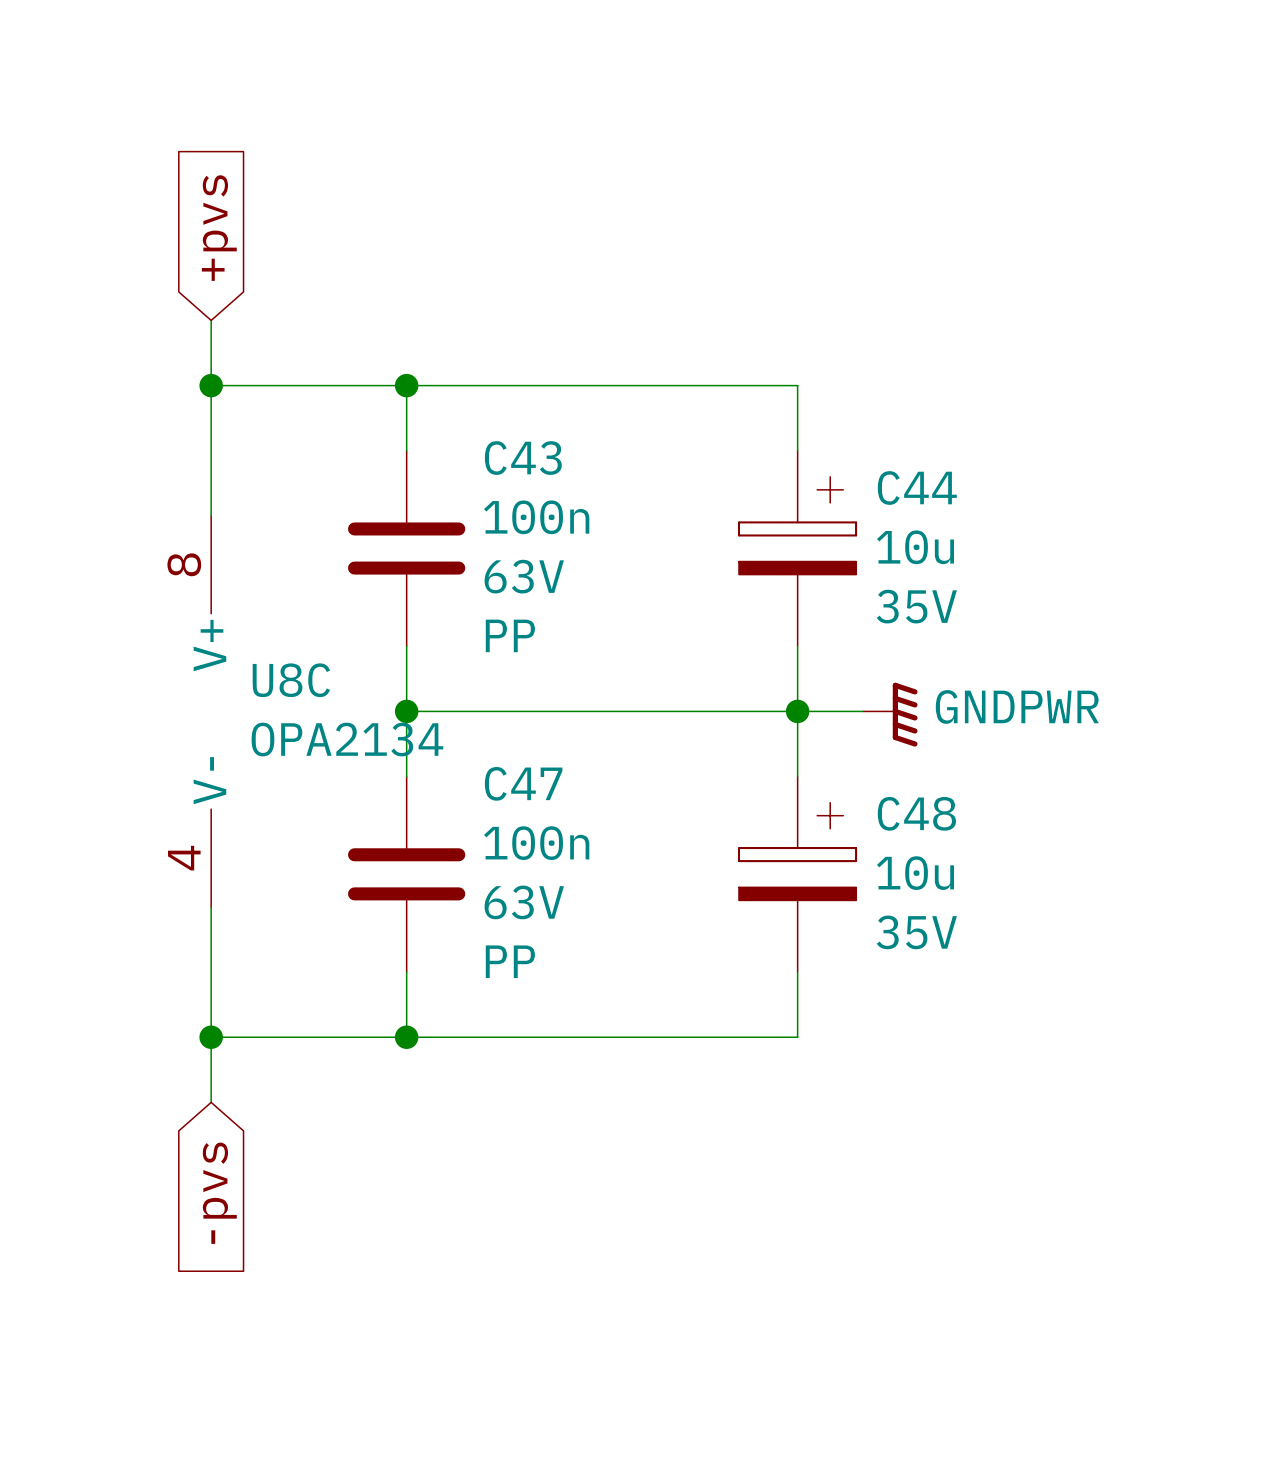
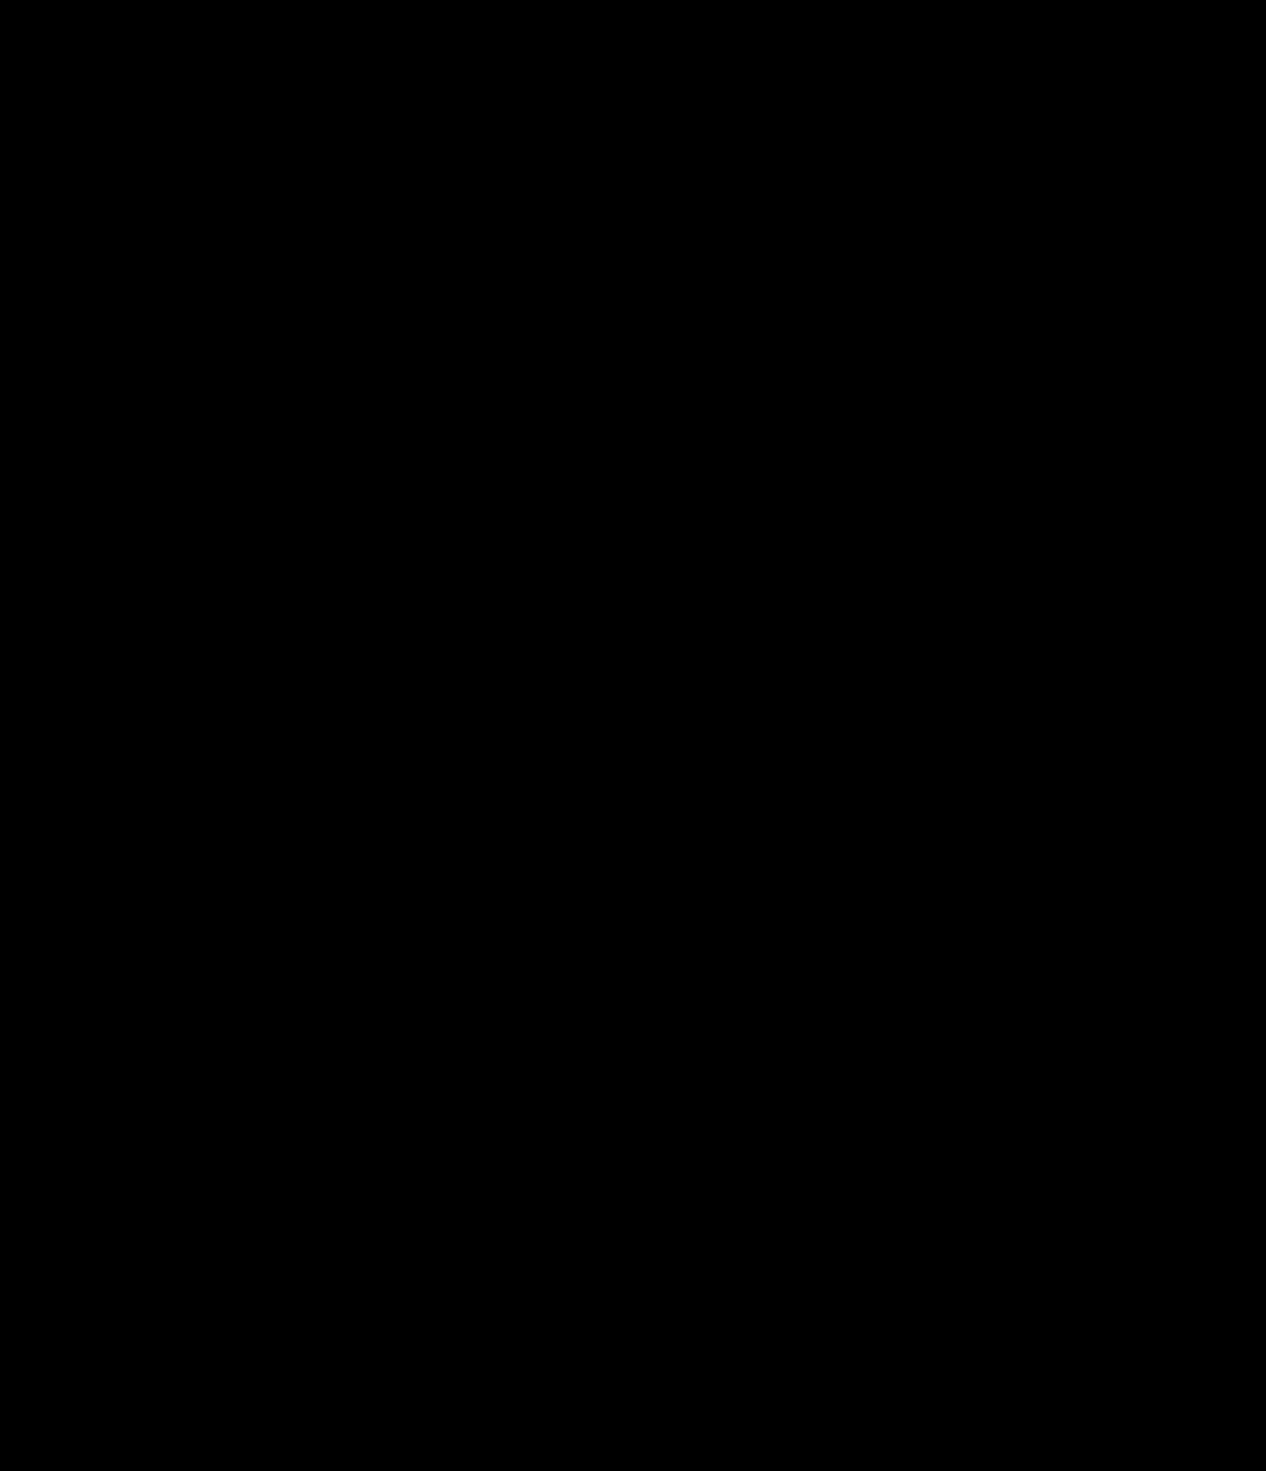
global label: +pvs (219, 228) -> none
wire: (211, 320) (211, 515) -> none
wire: (211, 385) (797, 385) (797, 450) -> none
junction: (211, 385) -> none
wire: (406, 385) (406, 450) -> none
junction: (406, 385) -> none
C43: 100n (406, 548) -> none
C44: 10u (797, 548) -> none
wire: (406, 646) (406, 776) -> none
wire: (797, 646) (797, 776) -> none
U8C: OPA2134 (211, 711) -> none
wire: (406, 711) (862, 711) -> none
junction: (406, 711) -> none
junction: (797, 711) -> none
power symbol: GNDPWR (890, 714) -> none
C47: 100n (406, 874) -> none
C48: 10u (797, 874) -> none
wire: (211, 906) (211, 1102) -> none
wire: (406, 972) (406, 1037) -> none
wire: (797, 972) (797, 1037) (211, 1037) -> none
junction: (211, 1037) -> none
junction: (406, 1037) -> none
global label: -pvs (219, 1193) -> none

